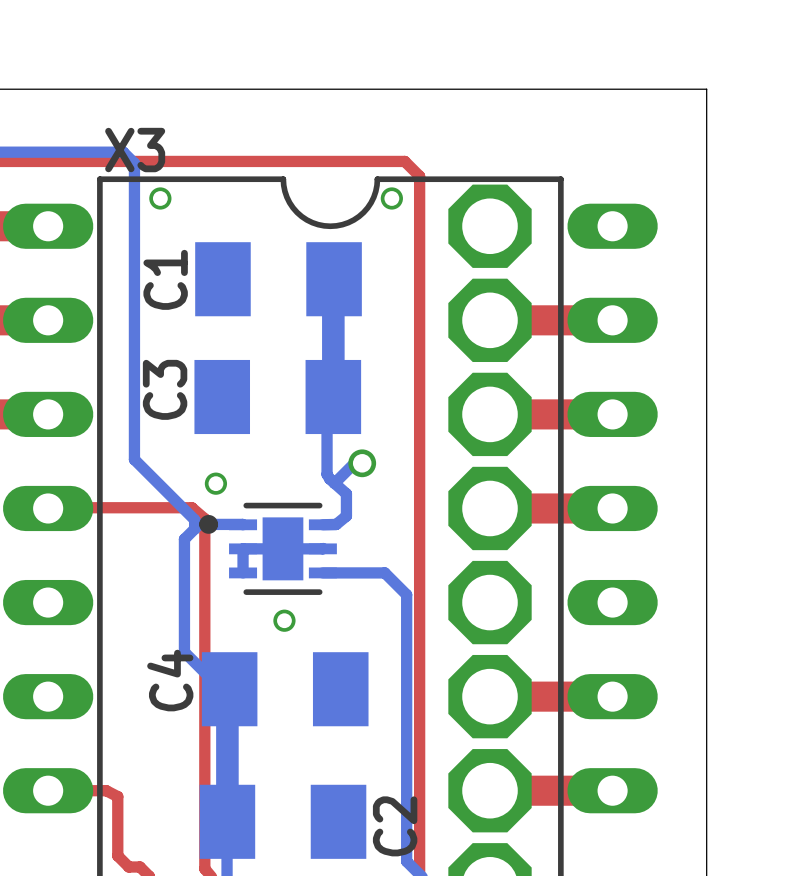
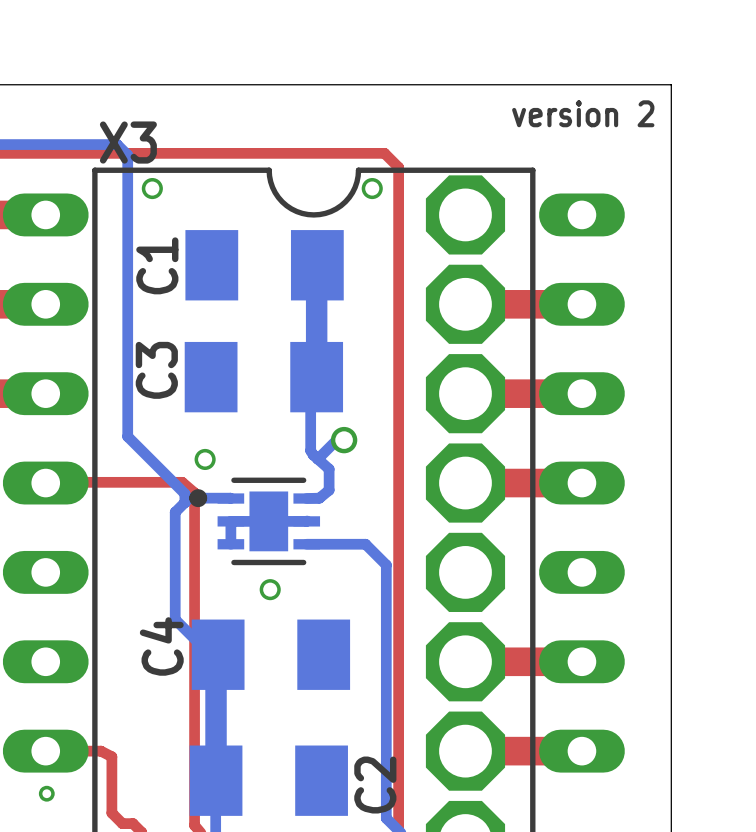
text: none -> version 2 (583, 113)
via: none -> (46, 793)

